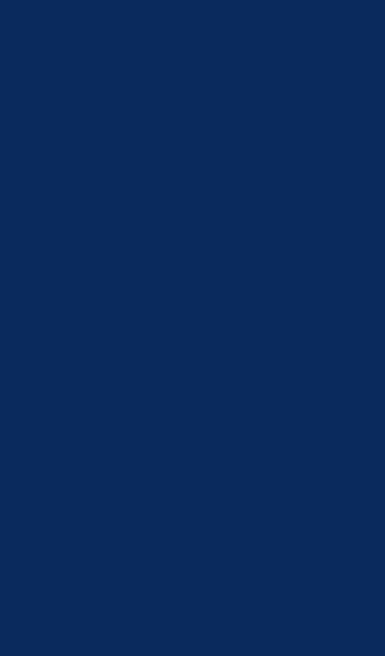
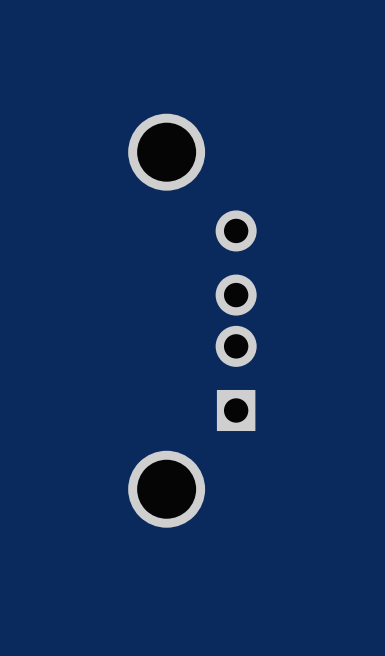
part: none -> (192, 320)

